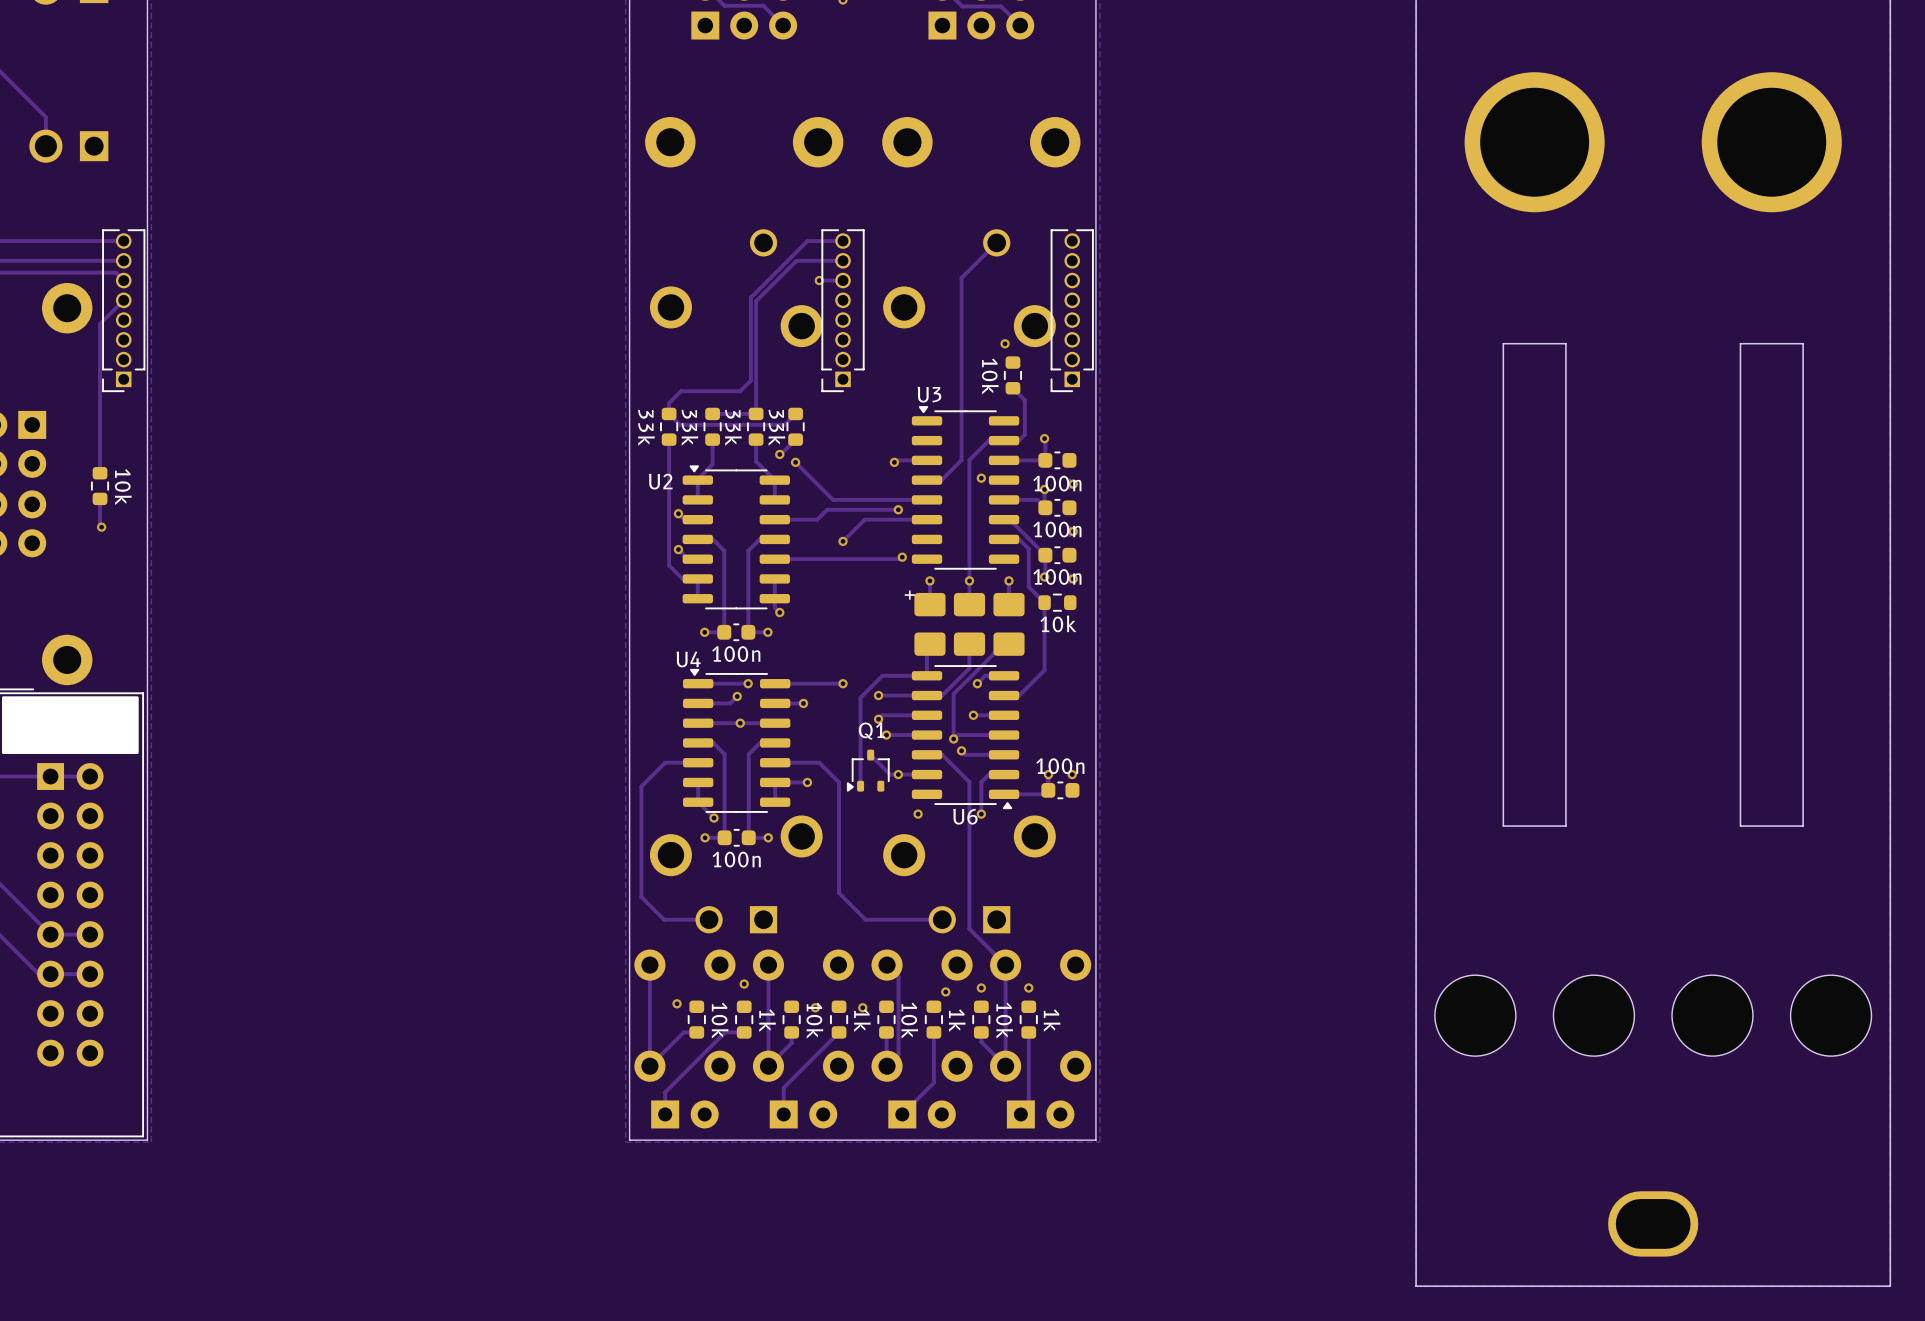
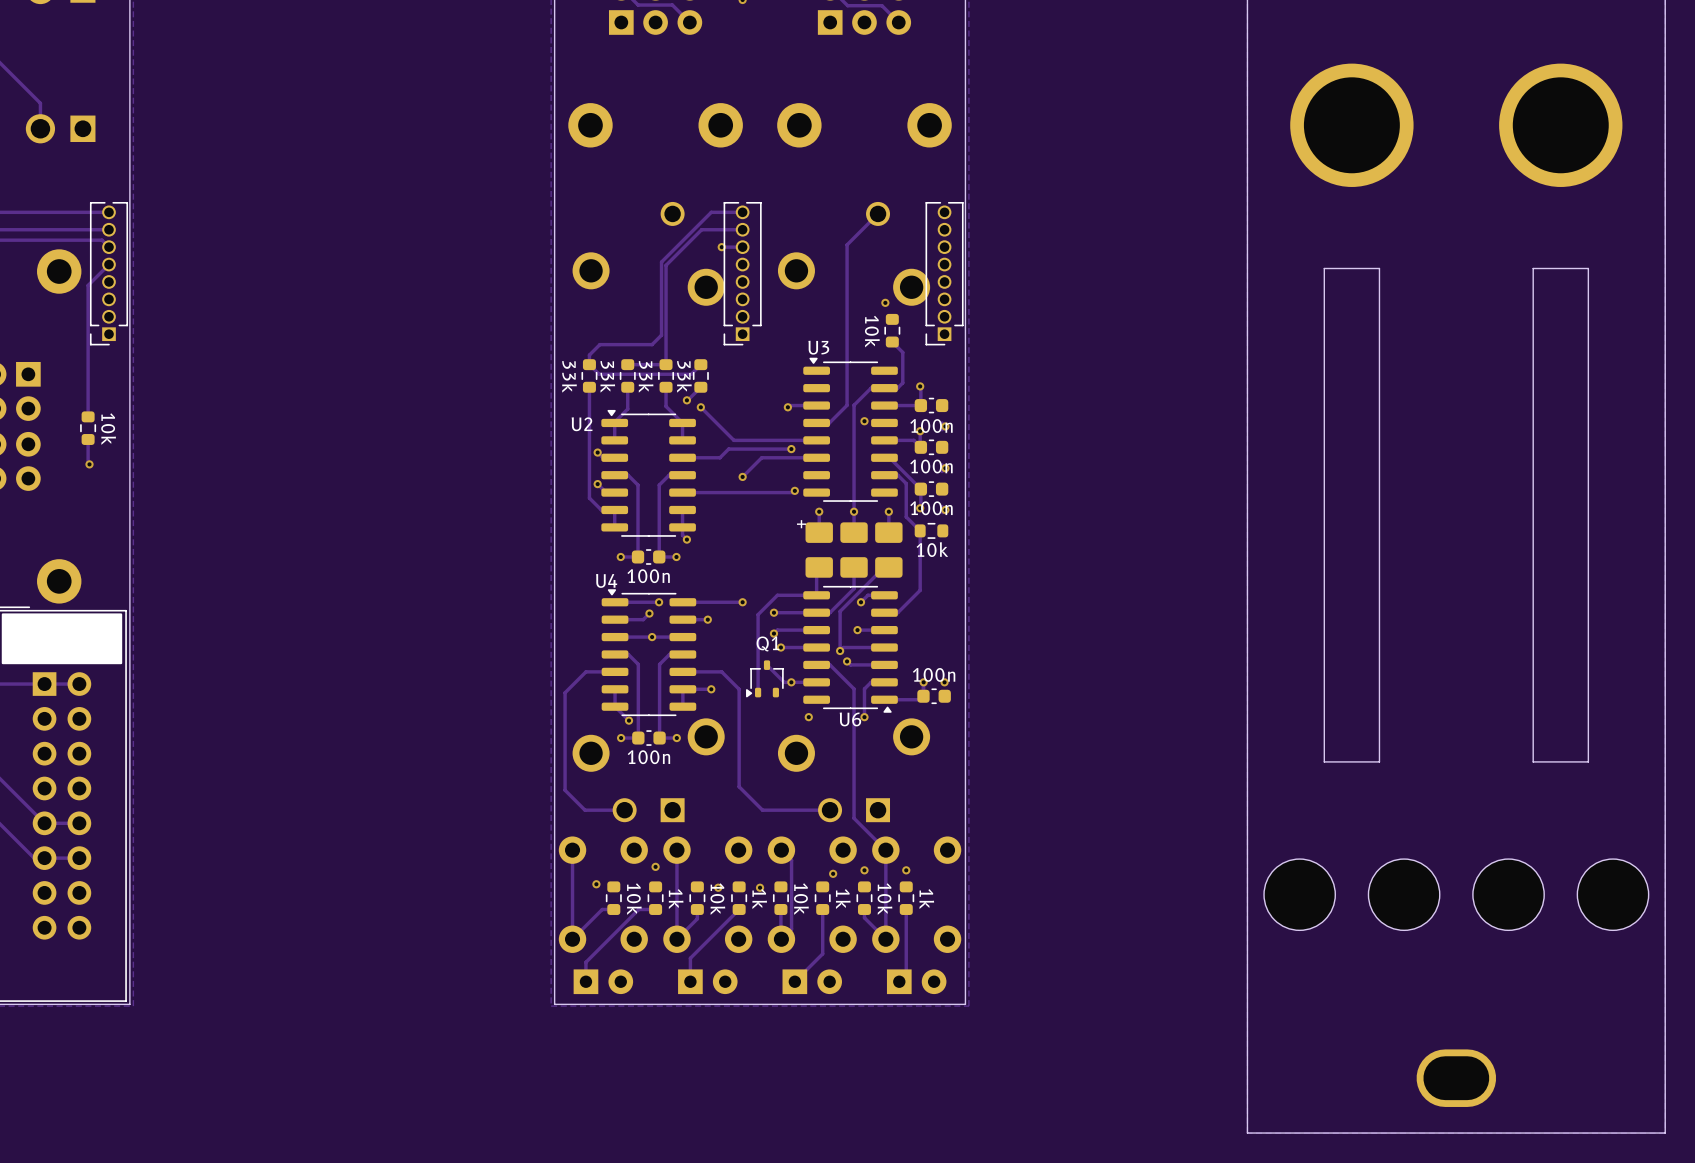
board edge: (1565, 343) (1503, 343) -> (1379, 302) (1379, 268) (1324, 268) (1324, 302)
board edge: (1803, 343) (1740, 343) -> (1588, 302) (1588, 268) (1533, 268) (1533, 302)
board edge: (1565, 826) (1503, 826) -> (1379, 727) (1379, 761) (1324, 761) (1324, 727)
board edge: (1803, 826) (1740, 826) -> (1588, 727) (1588, 761) (1533, 761) (1533, 727)

